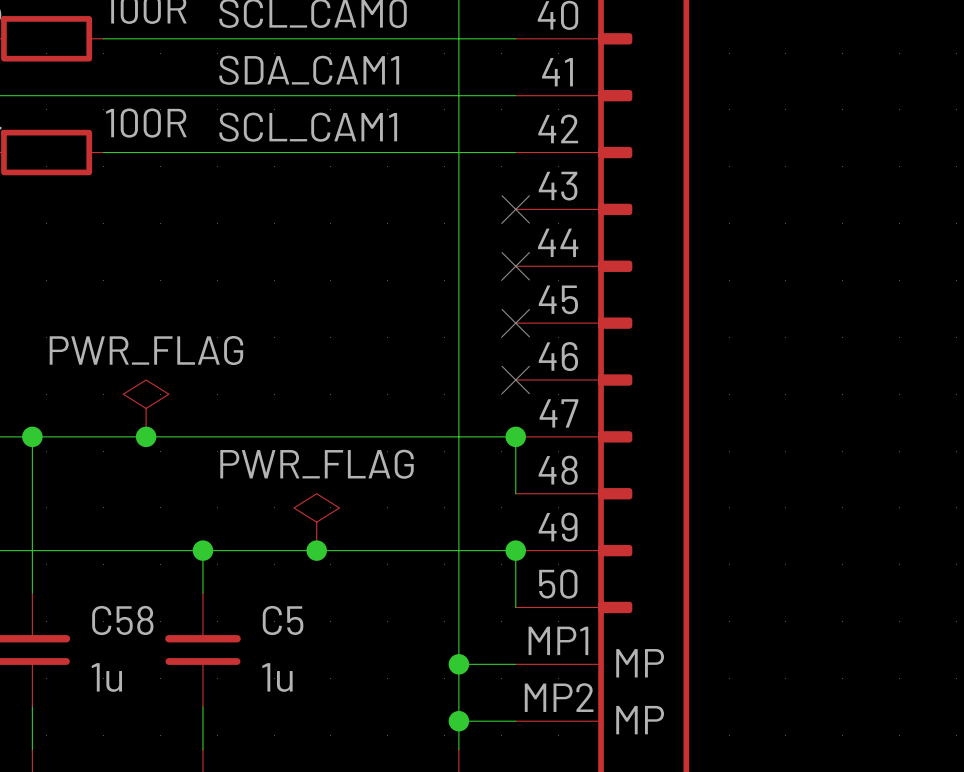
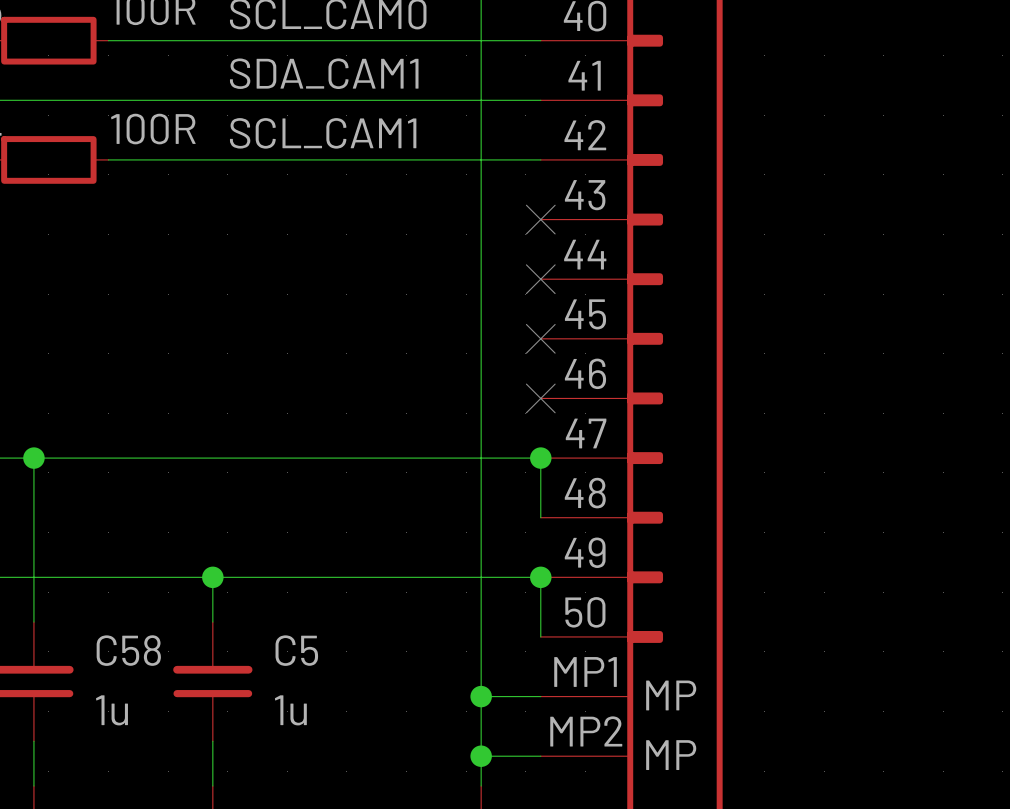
power symbol: PWR_FLAG (146, 408) -> none
junction: (146, 436) -> none
power symbol: PWR_FLAG (316, 522) -> none
junction: (316, 550) -> none

